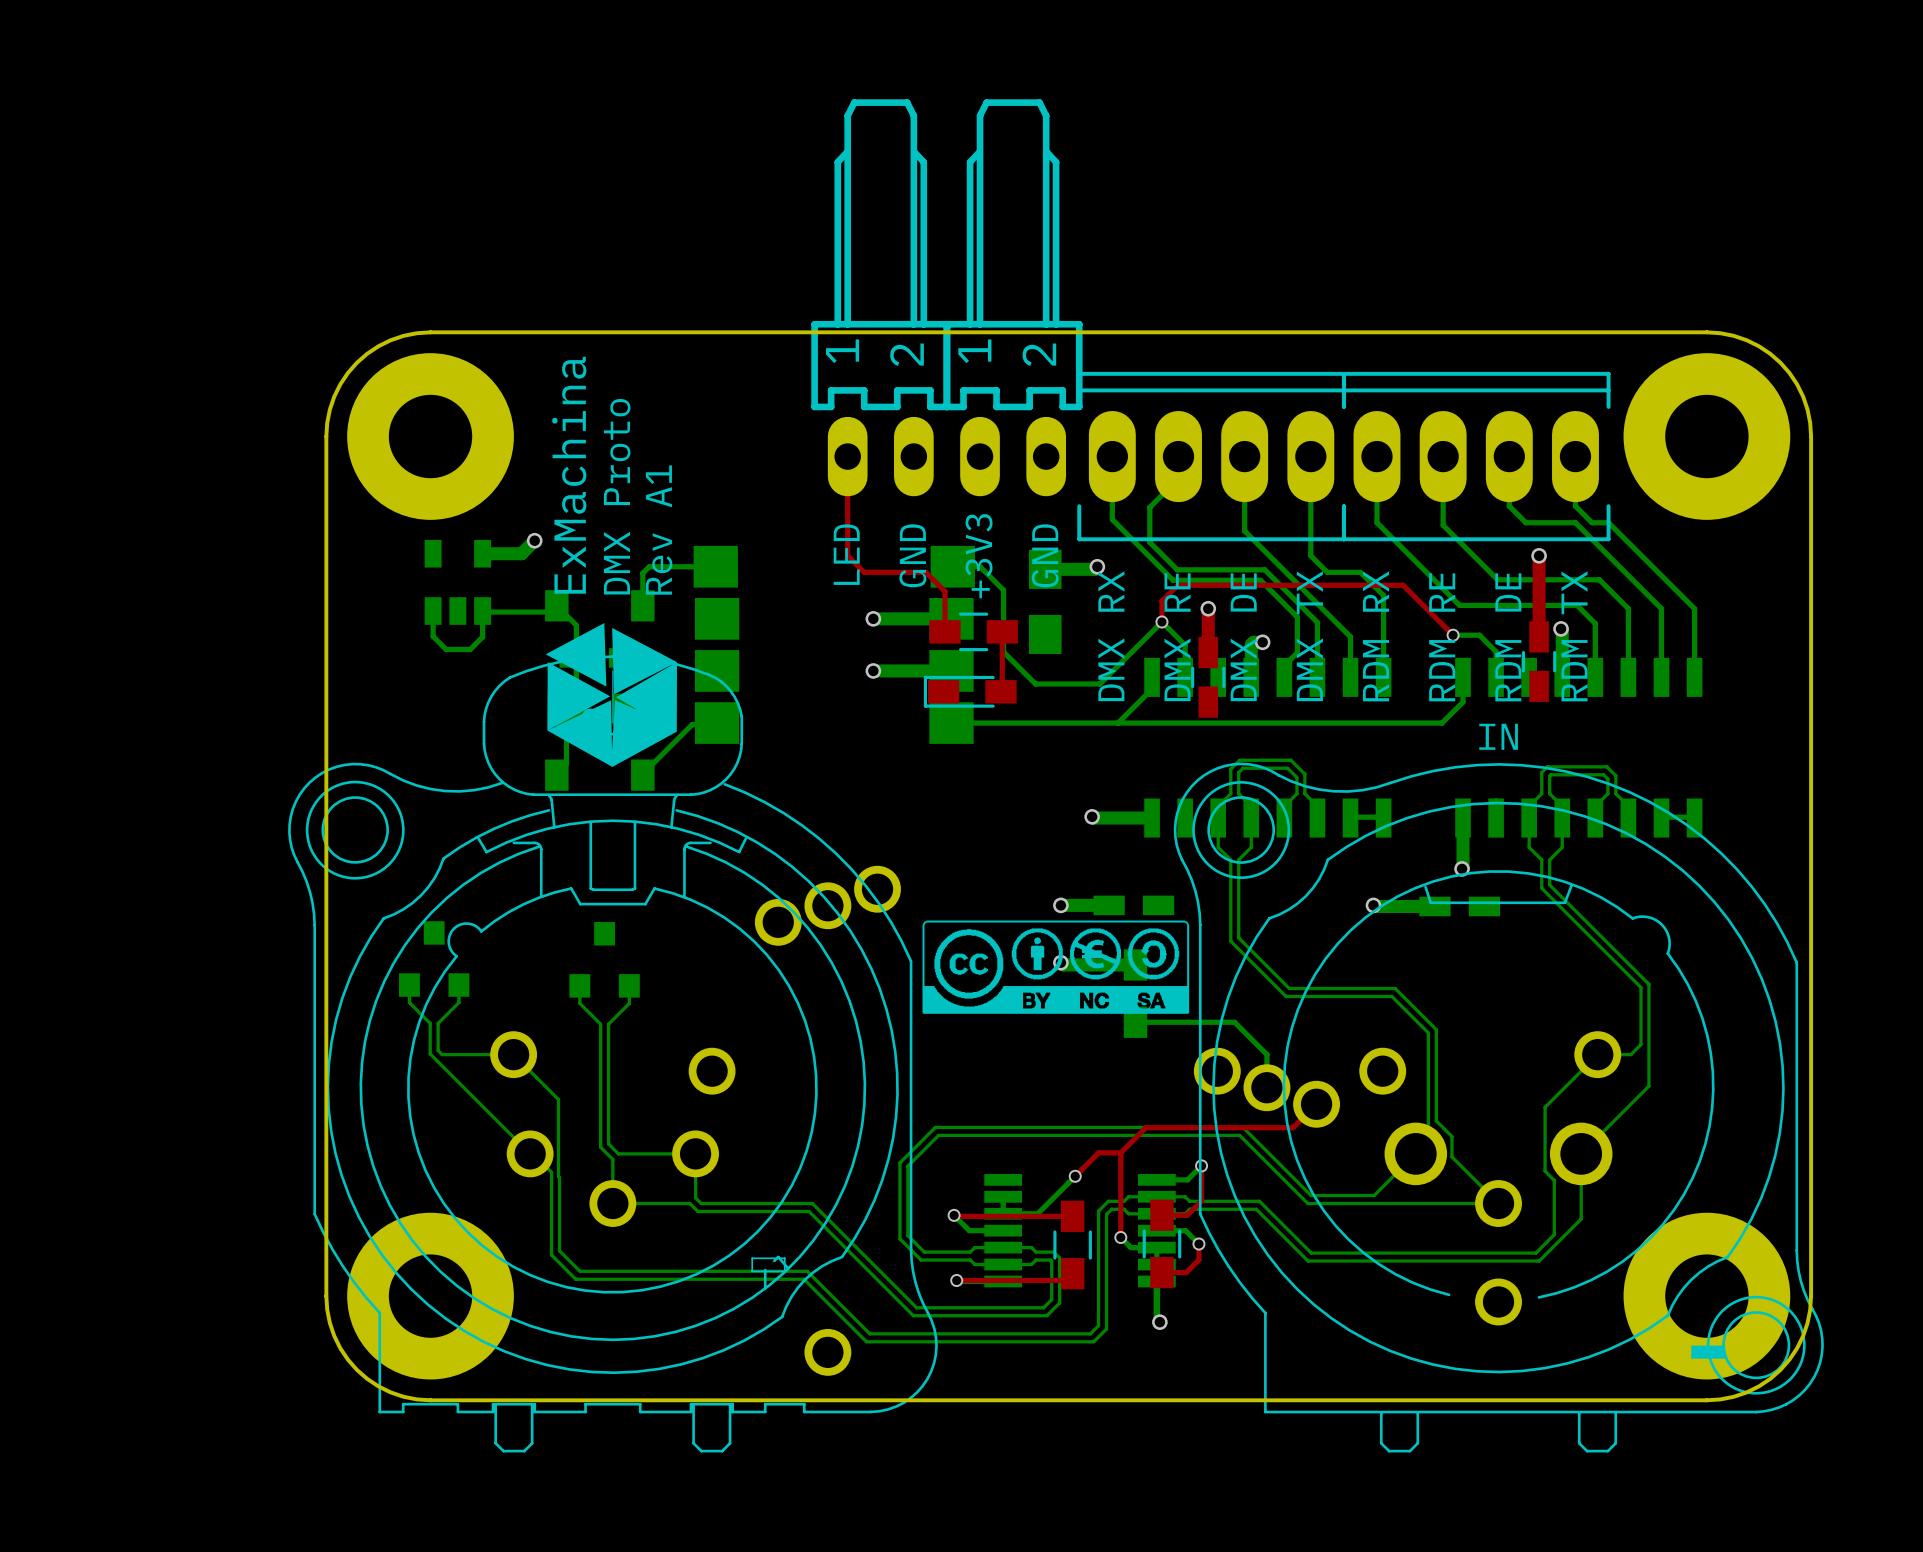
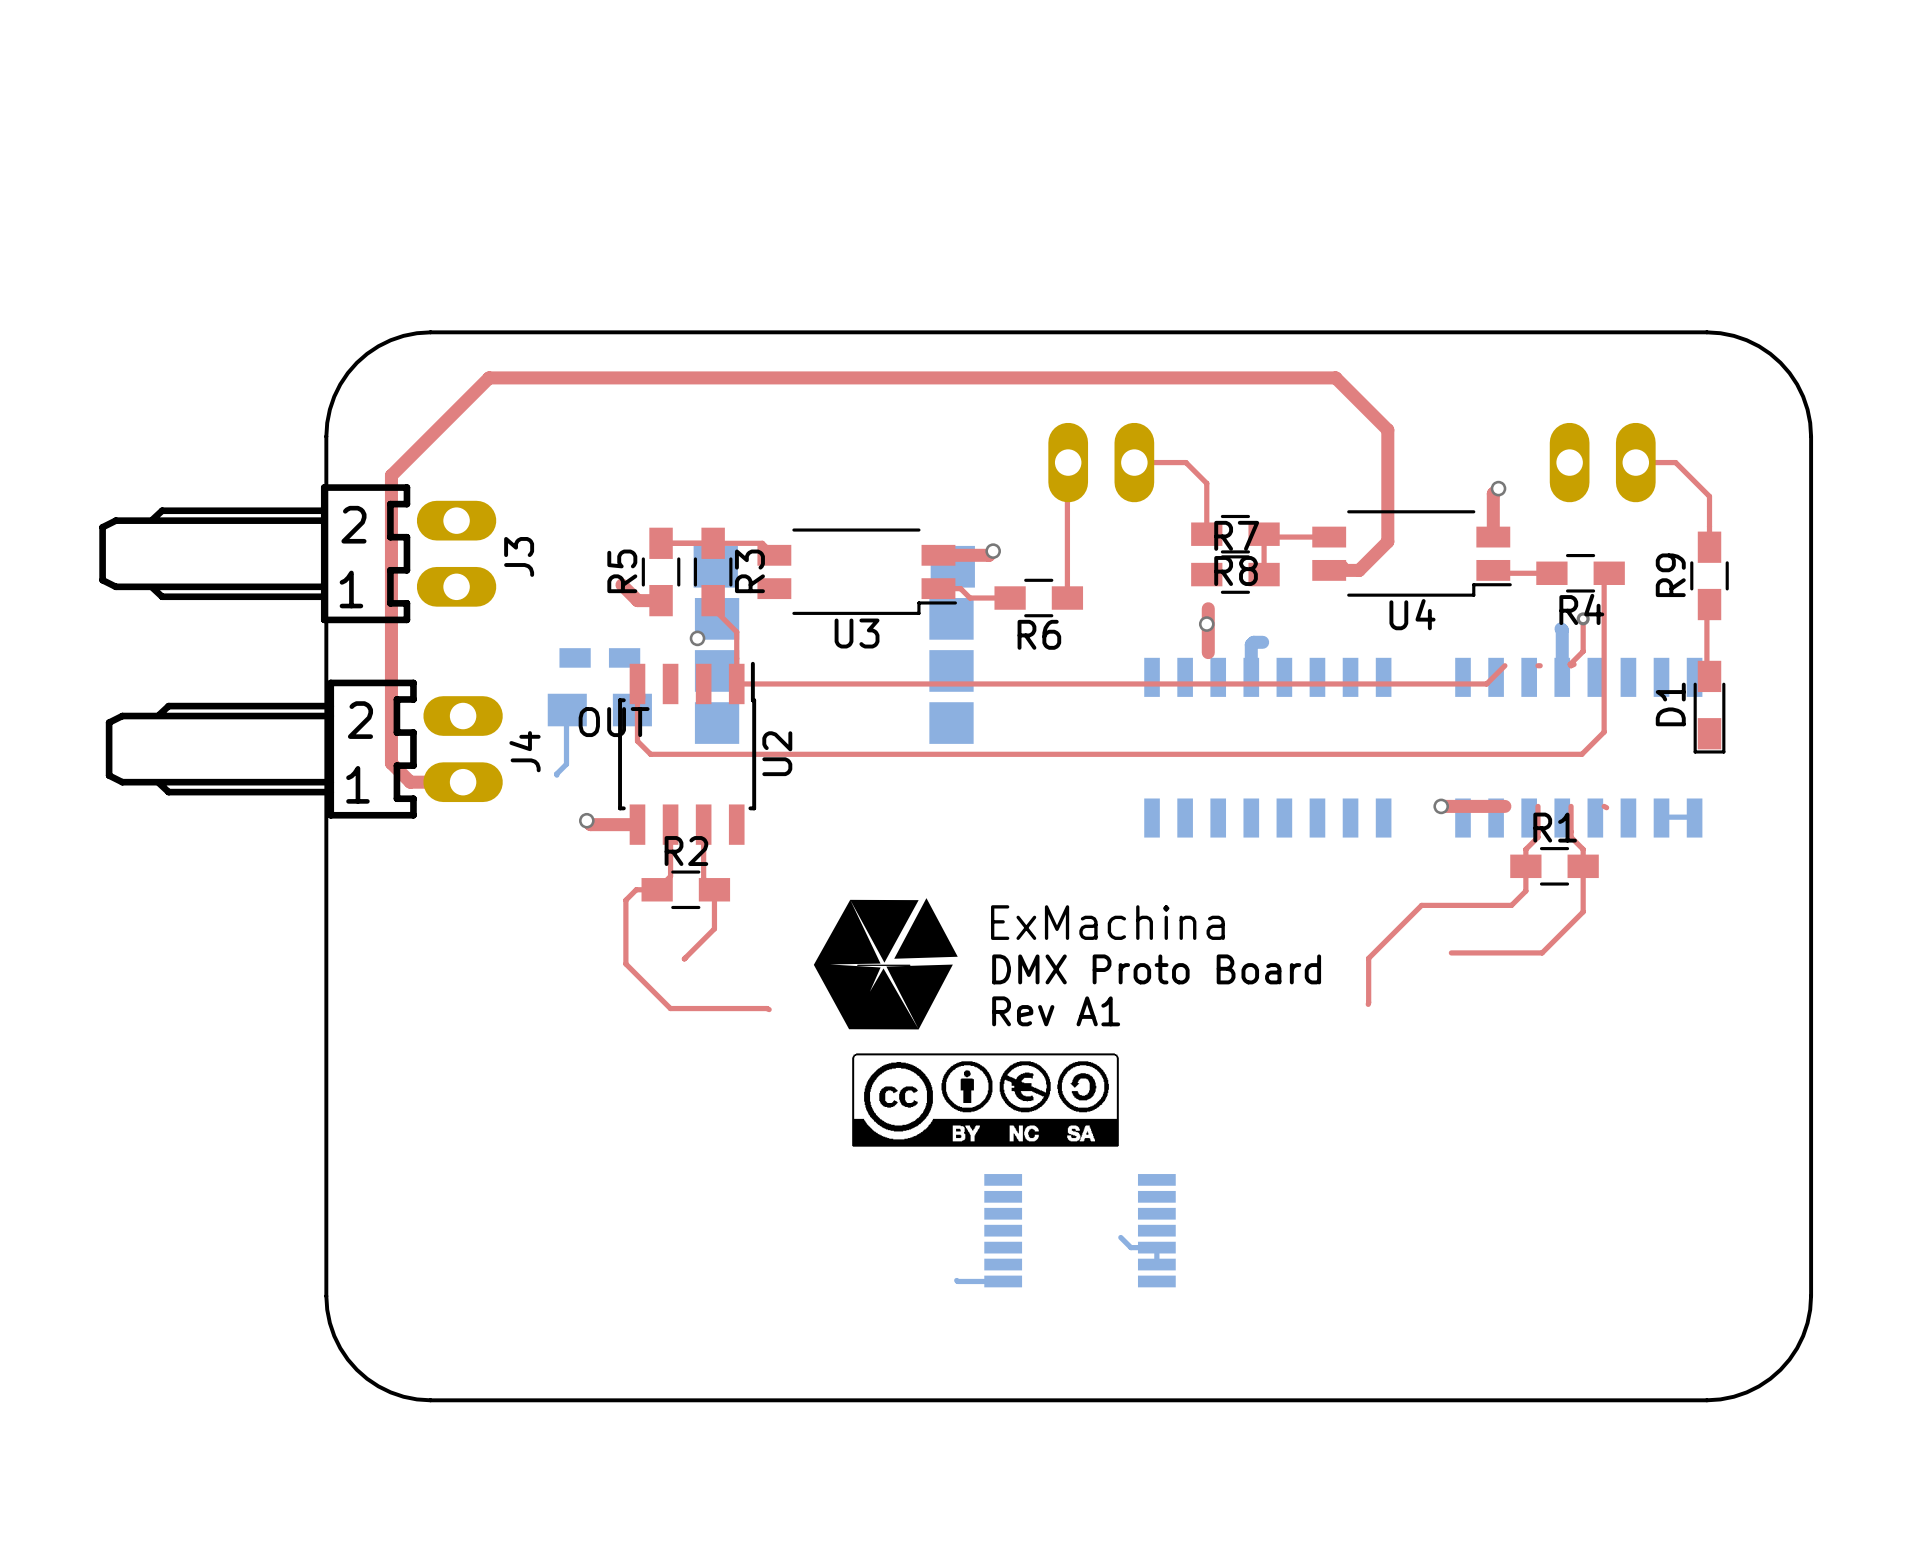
part: (880, 297) -> none
part: (1013, 297) -> none
part: (430, 436) -> none
part: (1706, 436) -> none
top track: (847, 456) (847, 555) (864, 572) (925, 572) (944, 591) (944, 631) -> none
bottom track: (1112, 456) (1112, 519) (1173, 580) (1260, 580) (1297, 617) (1297, 652) (1284, 665) (1284, 677) -> none
bottom track: (1178, 456) (1178, 478) (1149, 507) (1149, 542) (1177, 569) (1264, 569) (1317, 622) (1317, 677) -> none
part: (1211, 456) -> none
bottom track: (1244, 456) (1244, 531) (1350, 636) (1350, 677) -> none
bottom track: (1310, 456) (1310, 555) (1327, 572) (1360, 572) (1383, 595) (1383, 677) -> none
bottom track: (1377, 456) (1377, 522) (1459, 605) (1577, 605) (1595, 623) (1595, 677) -> none
bottom track: (1443, 456) (1443, 525) (1497, 579) (1599, 579) (1628, 608) (1628, 677) -> none
part: (1476, 456) -> none
bottom track: (1509, 456) (1509, 506) (1525, 522) (1575, 522) (1661, 608) (1661, 677) -> none
bottom track: (1575, 456) (1575, 506) (1592, 522) (1608, 522) (1694, 608) (1694, 677) -> none
top track: none -> (1068, 462) (1067, 598)
part: none -> (1101, 462)
top track: none -> (1134, 462) (1185, 462) (1206, 483) (1206, 534)
part: none -> (1602, 462)
top track: none -> (1635, 462) (1675, 462) (1709, 496) (1709, 547)
top track: none -> (1498, 488) (1493, 493) (1493, 537)
via: none -> (1498, 488)
text: DMX Proto (617, 496) -> none
text rotation: 0° (659, 530) -> 90° clockwise (1056, 1011)
text position: Rev A1 (659, 530) -> Rev A1 (1056, 1011)
R8: none -> (1235, 534)
top track: none -> (1329, 537) (1266, 537) (1264, 534) (1264, 574)
bottom track: (534, 540) (521, 553) (482, 553) -> none
via: (534, 540) -> none
top track: none -> (661, 543) (762, 543) (774, 555)
top track: none -> (993, 551) (989, 555) (938, 555)
via: none -> (993, 551)
J3: none -> (297, 553)
U4: none -> (1412, 553)
text: LED (846, 554) -> none
text: GND (912, 555) -> none
text: GND (1045, 555) -> none
top track: (1539, 555) (1539, 636) -> none
via: (1539, 555) -> none
text: +3V3 (979, 556) -> none
bottom track: (715, 565) (649, 566) (642, 573) (642, 605) -> none
bottom track: (952, 566) (980, 566) (1003, 590) (1003, 652) (1035, 683) (1099, 683) (1161, 621) (1185, 645) (1185, 677) -> none
bottom track: (1097, 566) (1094, 569) (1045, 569) -> none
via: (1097, 566) -> none
top track: none -> (1329, 570) (1359, 570) (1387, 541) (1387, 430) (1335, 377) (489, 377) (391, 475) (391, 763) (410, 782) (463, 782)
top track: none -> (1493, 570) (1496, 573) (1551, 573)
R5: none -> (661, 571)
R3: none -> (713, 571)
U3: none -> (857, 571)
R4: none -> (1580, 573)
top track: none -> (1609, 573) (1604, 578) (1604, 732) (1581, 754) (650, 754) (637, 741) (637, 683) (638, 697)
R7: none -> (1235, 574)
R9: none -> (1709, 575)
part: (457, 582) -> none
top track: none -> (621, 584) (637, 600) (661, 600)
top track: none -> (938, 588) (960, 588) (969, 598) (1010, 598)
R6: none -> (1038, 598)
top track: none -> (713, 600) (713, 608) (736, 632) (736, 683)
part: (1045, 601) -> none
top track: none -> (1709, 604) (1706, 605) (1706, 677) (1709, 676)
part: (599, 605) -> none
via position: (1208, 608) -> (1206, 624)
bottom track: (433, 611) (433, 636) (446, 649) (470, 649) (482, 637) (482, 611) (549, 612) (556, 605) (576, 625) (576, 701) (567, 710) -> none
bottom track: (873, 618) (951, 618) -> none
via: (873, 618) -> none
top track: none -> (1583, 618) (1583, 651) (1570, 664) (1574, 664)
via: none -> (1583, 618)
top track: (1161, 621) (1161, 601) (1177, 585) (1403, 585) (1453, 635) -> none
via: (1161, 621) -> none
drawing: [545, 623, 677, 767] -> none
via: (1561, 628) -> none
part: (973, 631) -> none
top track: (1002, 631) (1000, 691) -> none
bottom track: (1453, 635) (1479, 635) (1496, 651) (1496, 677) -> none
via: (1453, 635) -> none
text: DMX RX (1111, 636) -> none
text: DMX TX (1309, 636) -> none
text: RDM RX (1376, 636) -> none
text: RDM TX (1574, 636) -> none
text: DMX RE (1177, 637) -> none
text: DMX DE (1243, 637) -> none
text: RDM RE (1442, 637) -> none
text: RDM DE (1508, 637) -> none
via: none -> (697, 638)
via: (1262, 642) -> none
part: (1539, 661) -> none
top track: none -> (1504, 665) (1486, 683) (736, 683)
top track: none -> (1537, 665) (1540, 665)
bottom track: (873, 670) (951, 670) -> none
via: (873, 670) -> none
bottom track: (1152, 677) (1152, 689) (1118, 723) -> none
part: (1208, 677) -> none
bottom track: (1463, 677) (1463, 702) (1442, 723) (951, 723) -> none
part: (970, 691) -> none
D1: none -> (1709, 707)
bottom track: (717, 723) (718, 724) (692, 724) (642, 775) -> none
text: IN (1498, 736) -> none
J4: none -> (304, 749)
U2: none -> (687, 753)
part: (599, 775) -> none
top track: none -> (1441, 806) (1504, 806)
via: none -> (1441, 806)
top track: none -> (1537, 806) (1537, 837) (1525, 849) (1525, 891) (1511, 905) (1421, 905) (1368, 958) (1368, 1004)
top track: none -> (1571, 806) (1571, 837) (1583, 849) (1583, 911) (1542, 952) (1451, 952)
top track: none -> (1604, 806) (1606, 807)
bottom track: (1092, 816) (1152, 818) -> none
via: (1092, 816) -> none
bottom track: (1463, 817) (1462, 868) -> none
bottom track: (1284, 818) (1284, 806) (1296, 793) (1296, 777) (1287, 768) (1243, 768) (1238, 772) (1238, 793) (1251, 806) (1251, 847) (1238, 859) (1238, 937) (1289, 988) (1395, 988) (1436, 1029) (1436, 1120) (1451, 1136) (1451, 1156) (1498, 1203) (1307, 1203) (1239, 1135) (938, 1135) (907, 1166) (907, 1235) (924, 1252) (970, 1252) (974, 1247) (1031, 1247) (1036, 1252) (1053, 1252) (1059, 1258) (1059, 1302) (1046, 1315) (913, 1315) (809, 1211) (697, 1211) (689, 1203) (612, 1203) (612, 1159) (600, 1147) (600, 1024) (579, 1003) (579, 985) -> none
bottom track: (1317, 818) (1317, 806) (1304, 793) (1304, 774) (1290, 760) (1239, 760) (1230, 769) (1230, 793) (1218, 806) (1218, 847) (1230, 859) (1230, 941) (1286, 996) (1391, 996) (1428, 1032) (1428, 1141) (1374, 1195) (1311, 1195) (1243, 1127) (935, 1127) (899, 1162) (899, 1238) (921, 1260) (970, 1260) (974, 1264) (1031, 1264) (1036, 1260) (1050, 1260) (1051, 1299) (1043, 1307) (916, 1307) (812, 1203) (701, 1203) (695, 1197) (695, 1153) -> none
bottom track: (1350, 818) (1383, 818) -> none
bottom track: (1595, 818) (1595, 806) (1607, 793) (1607, 779) (1603, 774) (1549, 775) (1549, 793) (1562, 806) (1562, 847) (1549, 859) (1549, 884) (1648, 984) (1648, 1086) (1581, 1153) -> none
bottom track: (1628, 818) (1628, 806) (1615, 793) (1615, 775) (1606, 766) (1547, 766) (1541, 772) (1541, 793) (1529, 806) (1529, 847) (1541, 859) (1541, 888) (1640, 987) (1640, 1044) (1630, 1054) (1597, 1054) -> none
top track: none -> (586, 820) (590, 824) (637, 824)
via: none -> (586, 820)
top track: none -> (670, 824) (670, 876) (657, 889) (636, 889) (625, 900) (625, 964) (670, 1008) (769, 1009)
top track: none -> (703, 824) (703, 878) (714, 889) (714, 928) (684, 958)
R1: none -> (1554, 866)
via: (1462, 868) -> none
R2: none -> (685, 889)
drawing: none -> [813, 898, 958, 1030]
bottom track: (1060, 905) (1109, 905) -> none
via: (1060, 905) -> none
part: (1133, 905) -> none
bottom track: (1373, 905) (1434, 906) -> none
via: (1373, 905) -> none
part: (1459, 906) -> none
part: (434, 959) -> none
part: (604, 959) -> none
bottom track: (1060, 962) (1063, 964) (1135, 964) -> none
via: (1060, 962) -> none
drawing position: (1055, 967) -> (985, 1100)
text: none -> DMX Proto Board (1156, 969)
bottom track: (409, 985) (409, 1002) (430, 1023) (430, 1053) (530, 1153) -> none
bottom track: (458, 985) (458, 1002) (438, 1023) (438, 1050) (442, 1054) (513, 1054) (558, 1099) (559, 1250) (579, 1271) (807, 1271) (869, 1333) (1090, 1333) (1098, 1325) (1098, 1211) (1108, 1201) (1124, 1201) (1128, 1196) (1185, 1196) (1189, 1201) (1259, 1201) (1311, 1253) (1535, 1253) (1554, 1234) (1554, 1180) (1545, 1171) (1545, 1107) (1597, 1054) -> none
bottom track: (629, 985) (629, 1003) (608, 1024) (608, 1143) (618, 1153) (695, 1153) -> none
part: (1135, 993) -> none
bottom track: (1135, 1022) (1234, 1022) (1266, 1054) (1266, 1087) -> none
part: (612, 1053) -> none
top track: (1317, 1104) (1293, 1127) (1145, 1127) (1120, 1152) -> none
part: (1498, 1107) -> none
top track: (1120, 1152) (1098, 1152) (1075, 1176) -> none
top track: (1120, 1152) (1120, 1237) -> none
bottom track: (530, 1153) (533, 1153) (551, 1172) (551, 1255) (575, 1279) (803, 1279) (866, 1341) (1093, 1341) (1106, 1329) (1106, 1214) (1111, 1209) (1124, 1209) (1128, 1213) (1185, 1213) (1189, 1209) (1256, 1209) (1308, 1261) (1539, 1261) (1581, 1219) (1581, 1153) -> none
top track: (1201, 1165) (1201, 1200) (1187, 1215) (1161, 1215) -> none
bottom track: (1201, 1165) (1187, 1179) (1156, 1179) -> none
via: (1201, 1165) -> none
bottom track: (1075, 1176) (1037, 1213) (1003, 1213) (1003, 1198) -> none
via: (1075, 1176) -> none
top track: (954, 1215) (1072, 1216) -> none
bottom track: (954, 1215) (969, 1230) (1003, 1230) -> none
via: (954, 1215) -> none
bottom track: (1156, 1230) (1185, 1230) (1198, 1244) -> none
via: (1120, 1237) -> none
part: (1161, 1243) -> none
top track: (1198, 1244) (1198, 1259) (1186, 1272) (1158, 1272) -> none
via: (1198, 1244) -> none
part: (1072, 1245) -> none
top track: (1072, 1273) (1065, 1280) (956, 1280) -> none
via: (956, 1280) -> none
bottom track: (1156, 1281) (1156, 1319) (1159, 1322) -> none
part: (430, 1296) -> none
part: (1706, 1296) -> none
via: (1159, 1322) -> none

